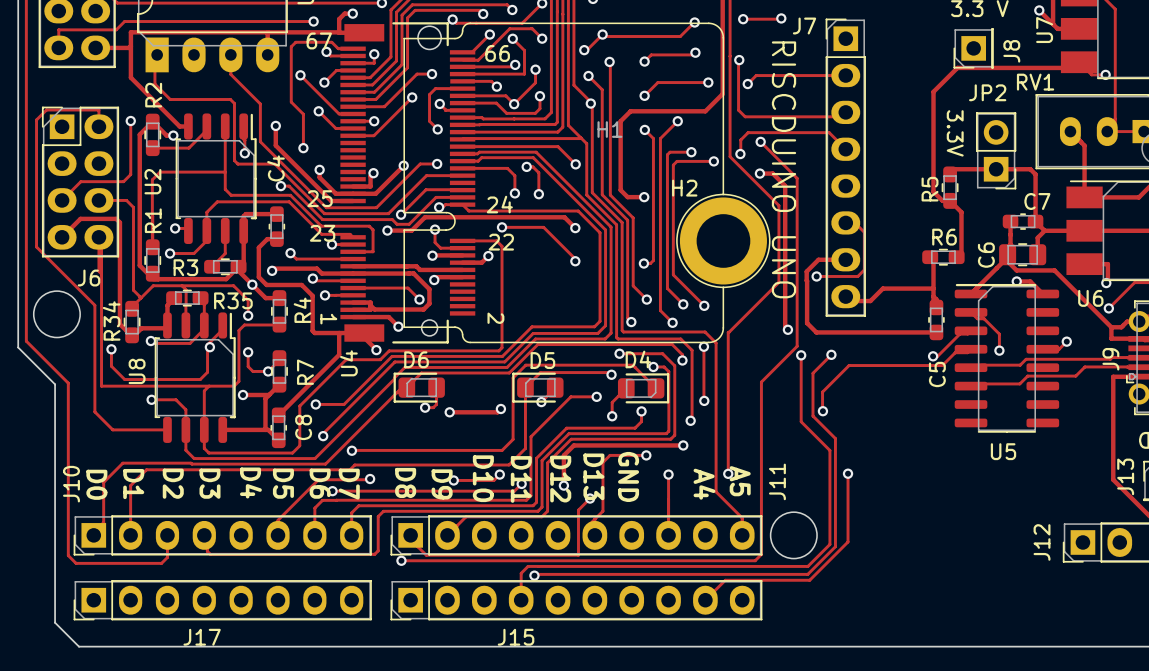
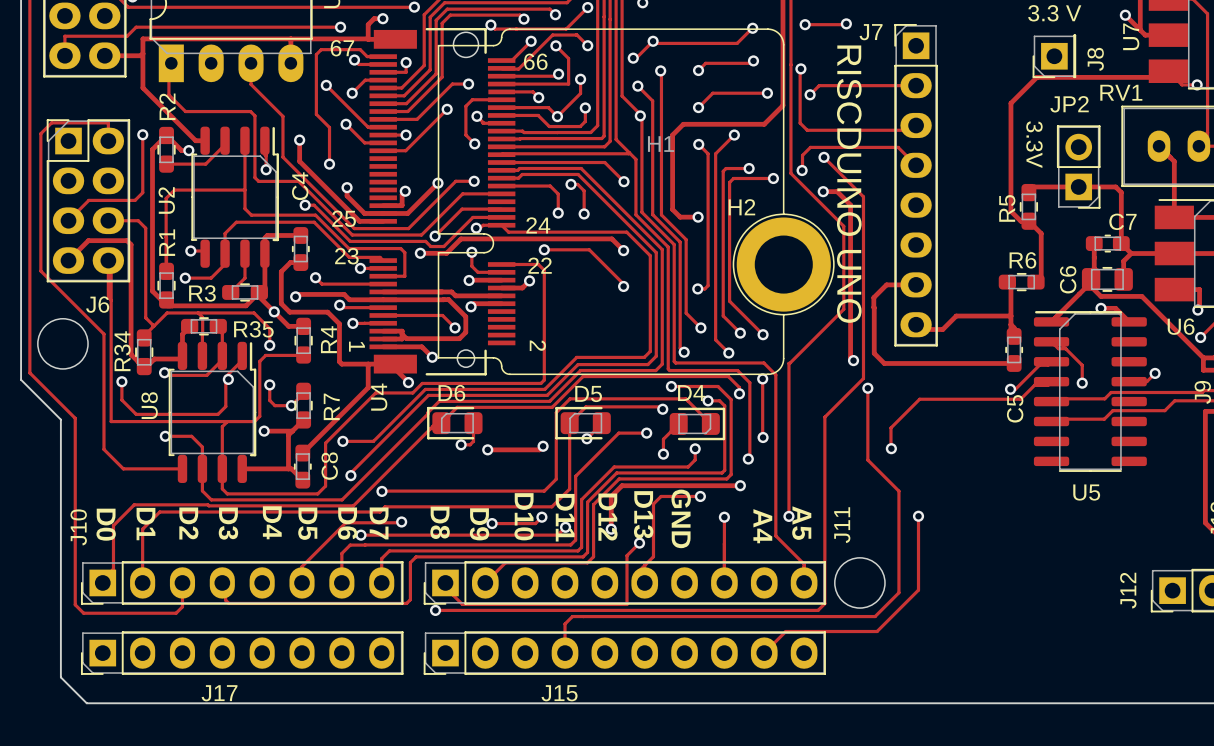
track: (855, 222) (864, 232) (864, 269) (857, 276) (816, 276) -> none
via: (816, 276) -> none
track: (831, 354) (812, 373) (812, 416) (835, 438) (835, 546) (807, 574) (534, 575) -> none
via: (831, 354) -> none
via: (534, 575) -> none

